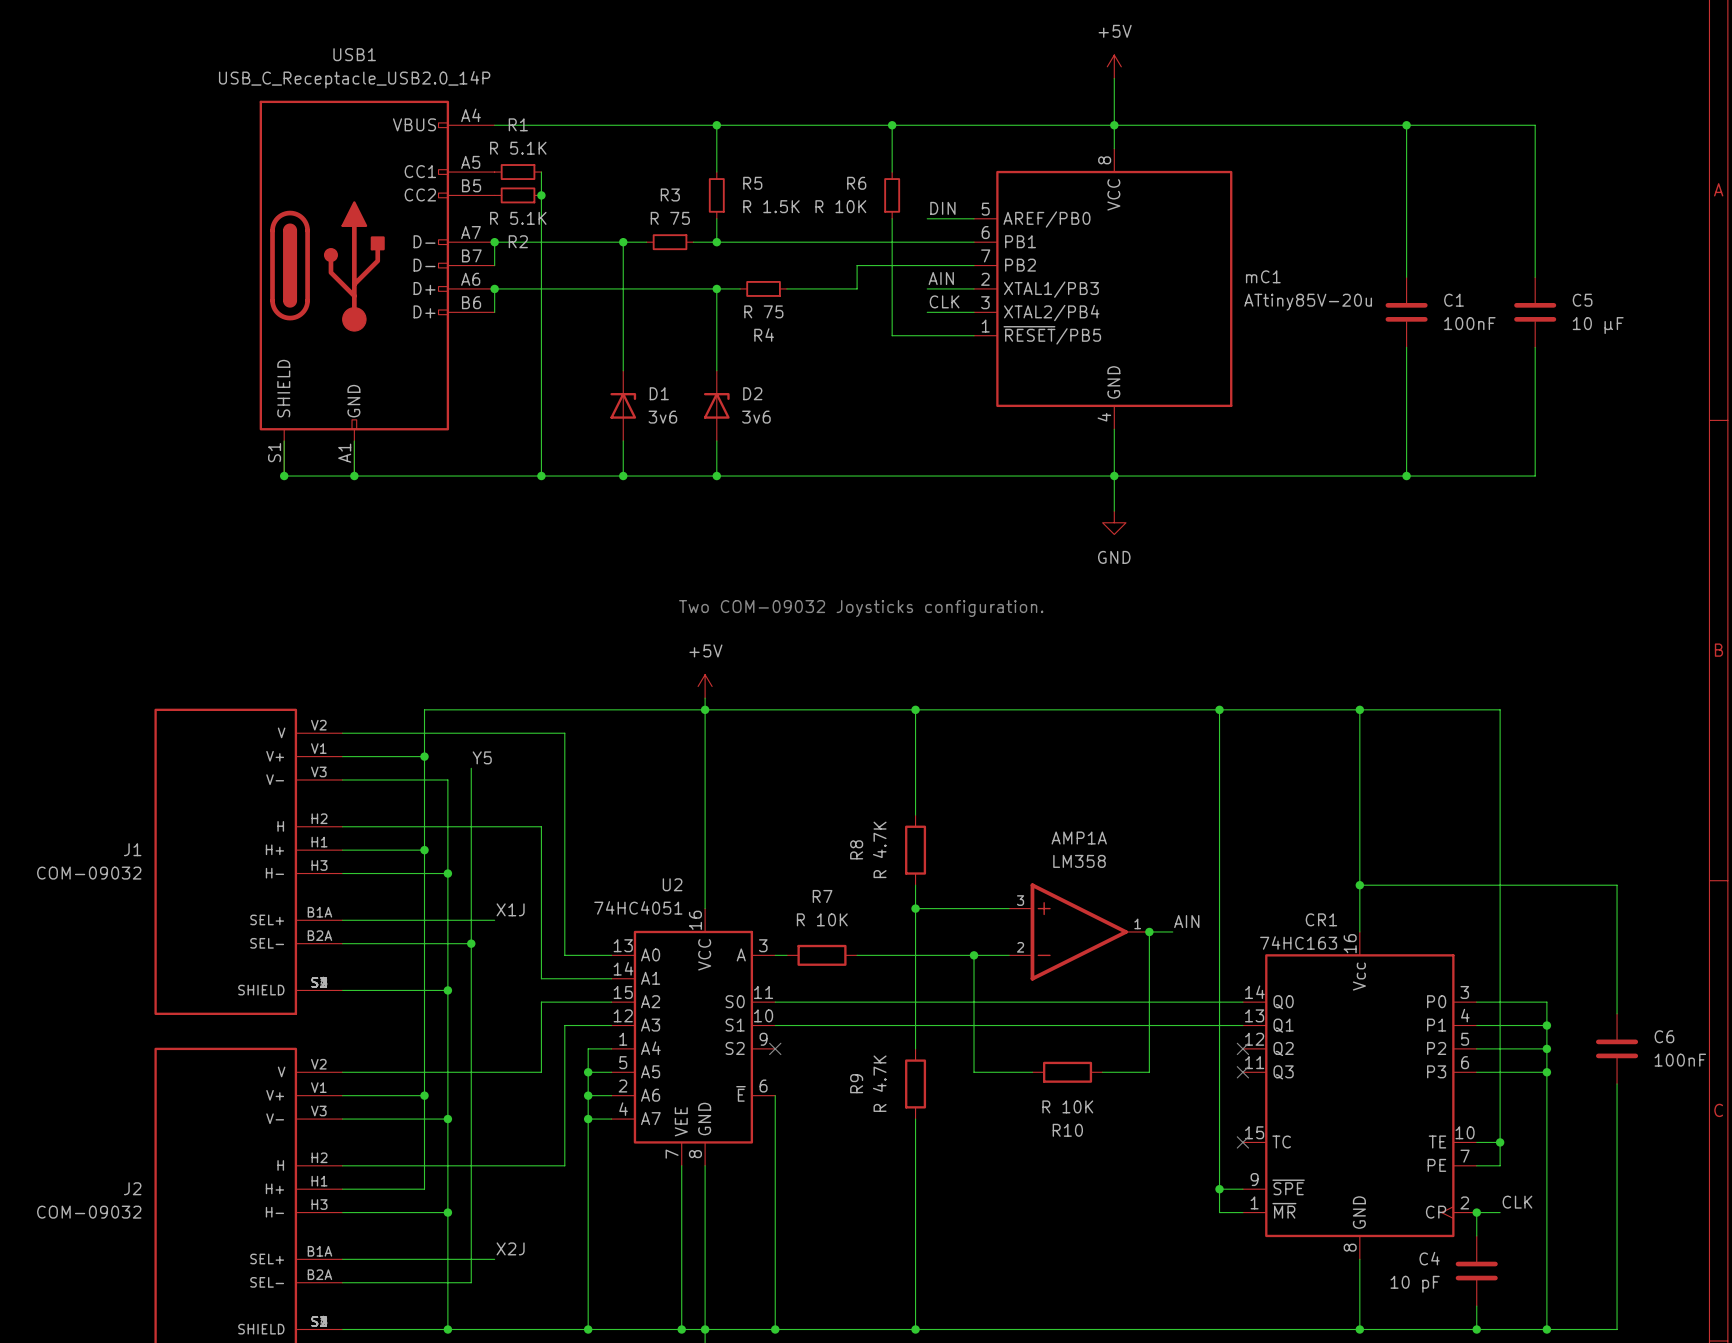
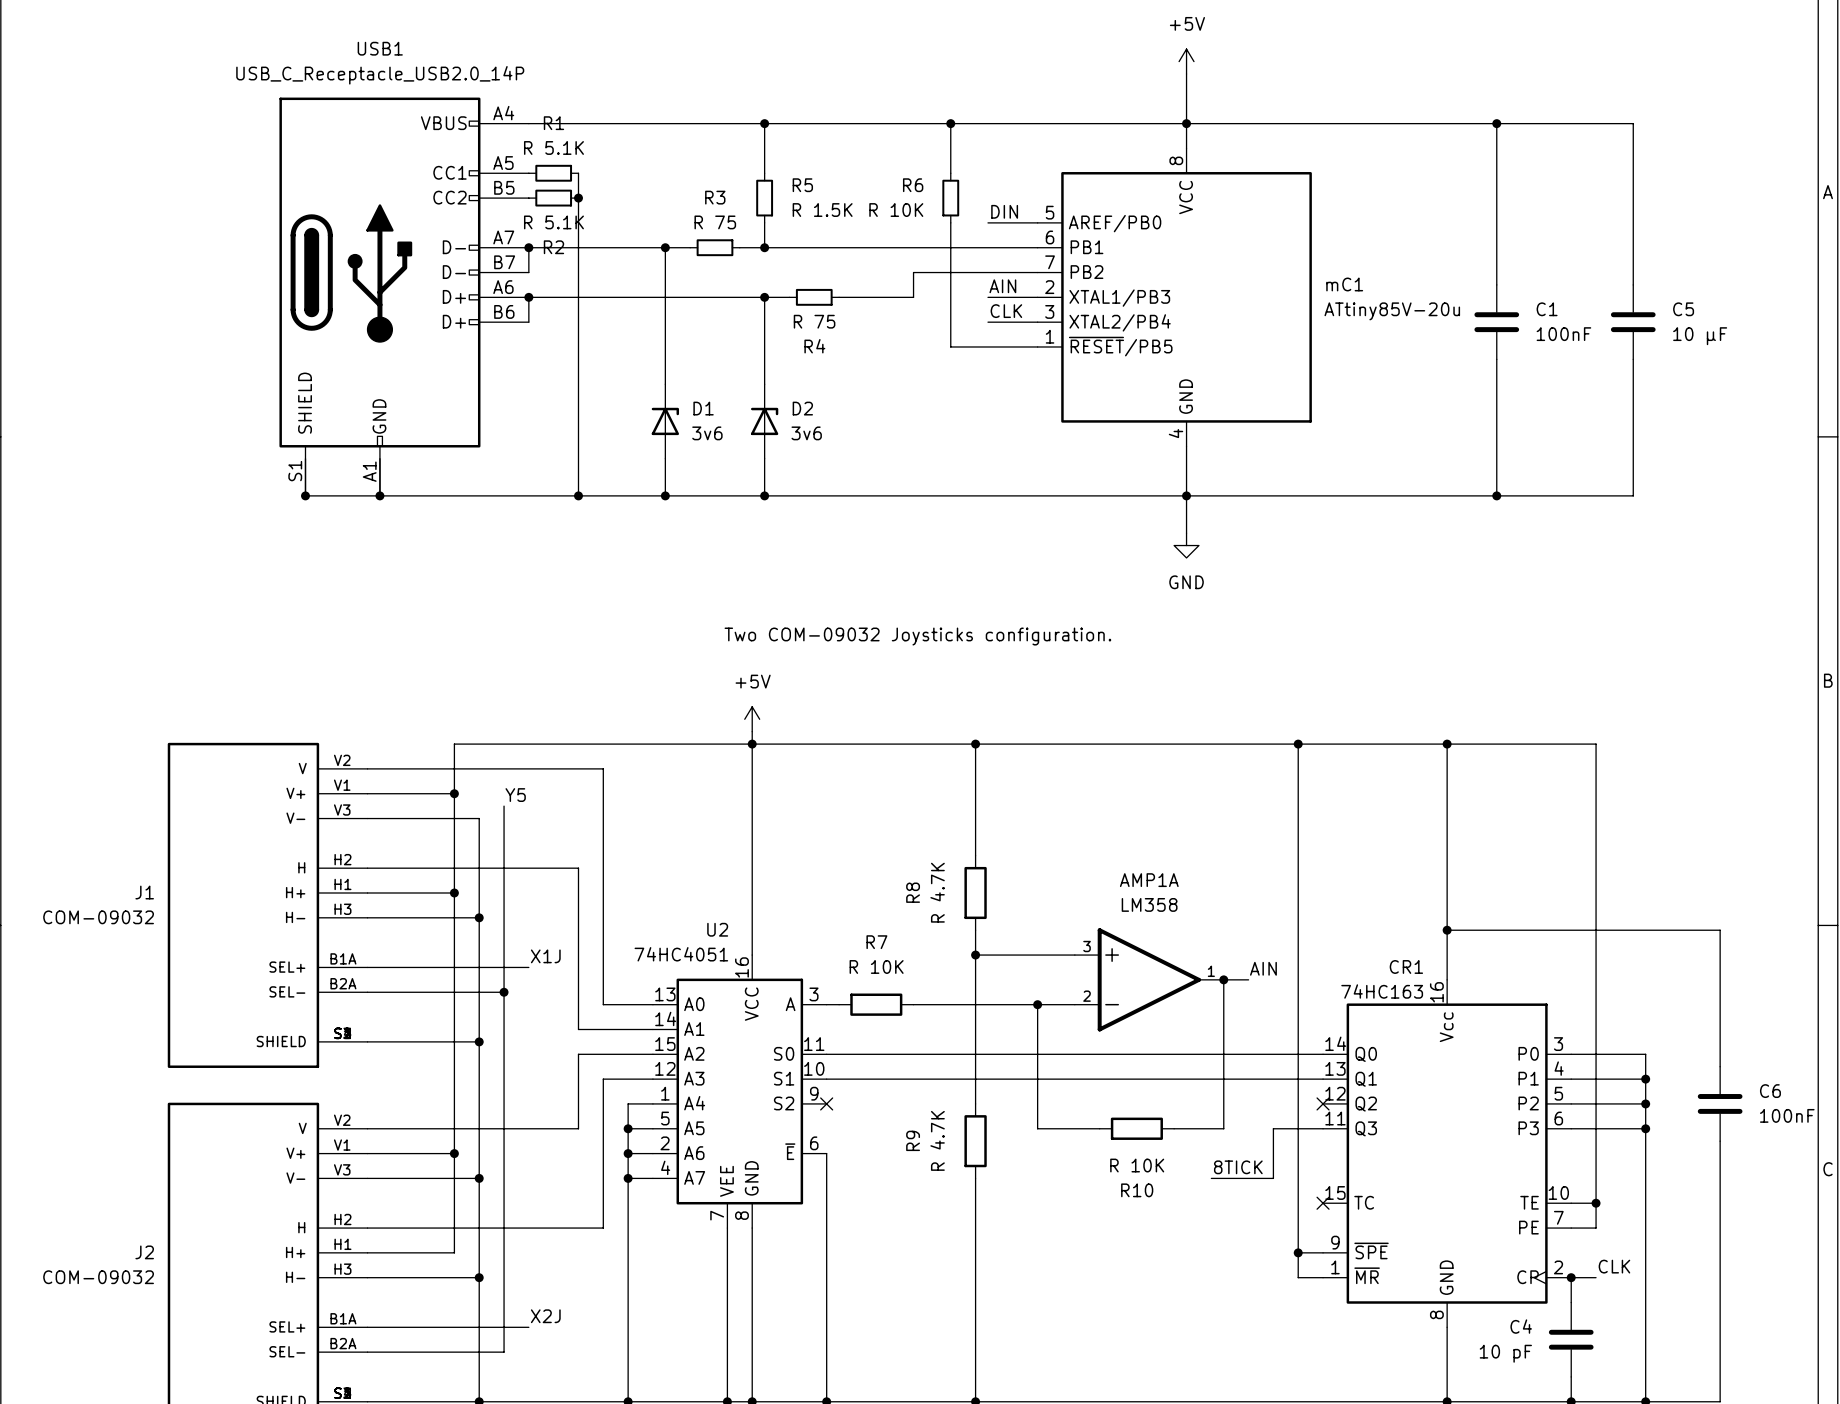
wire: none -> (1323, 1128) (1273, 1128) (1273, 1178) (1211, 1178)
no-connect mark: (1242, 1072) -> none
label: none -> 8TICK (1238, 1167)

